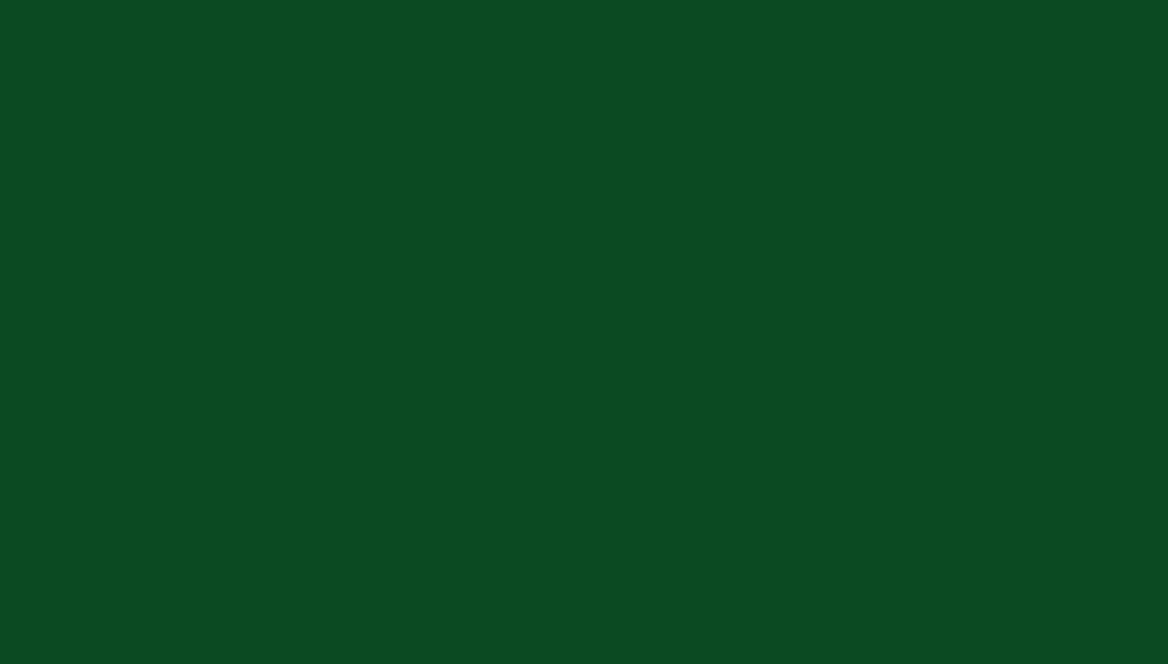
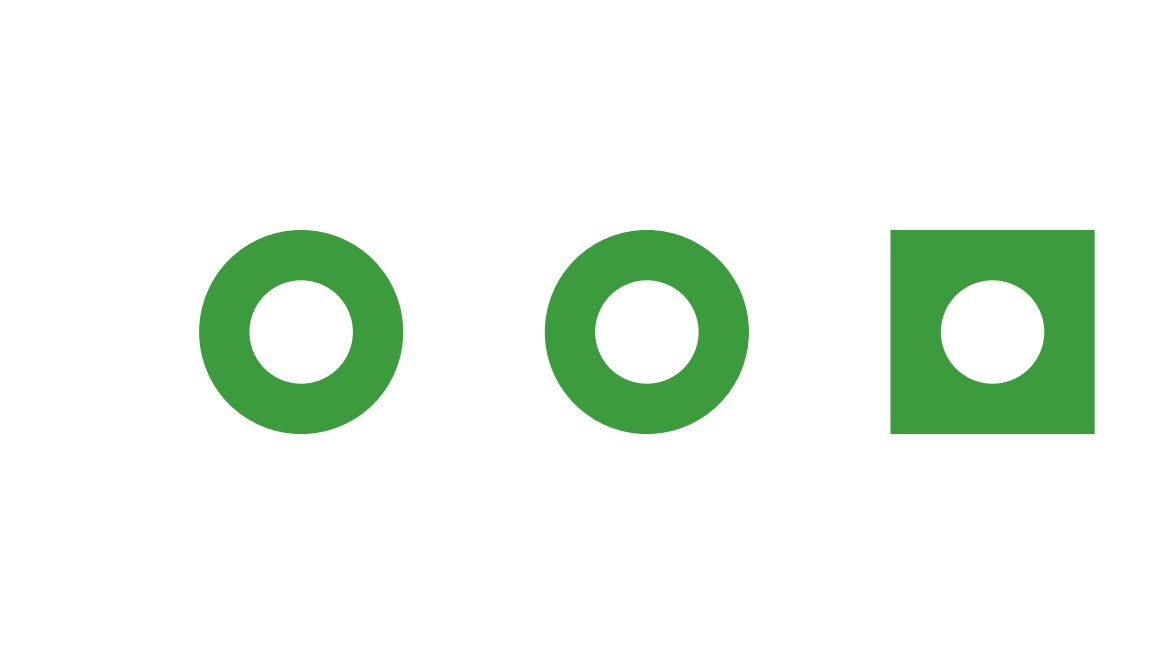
part: none -> (646, 332)

